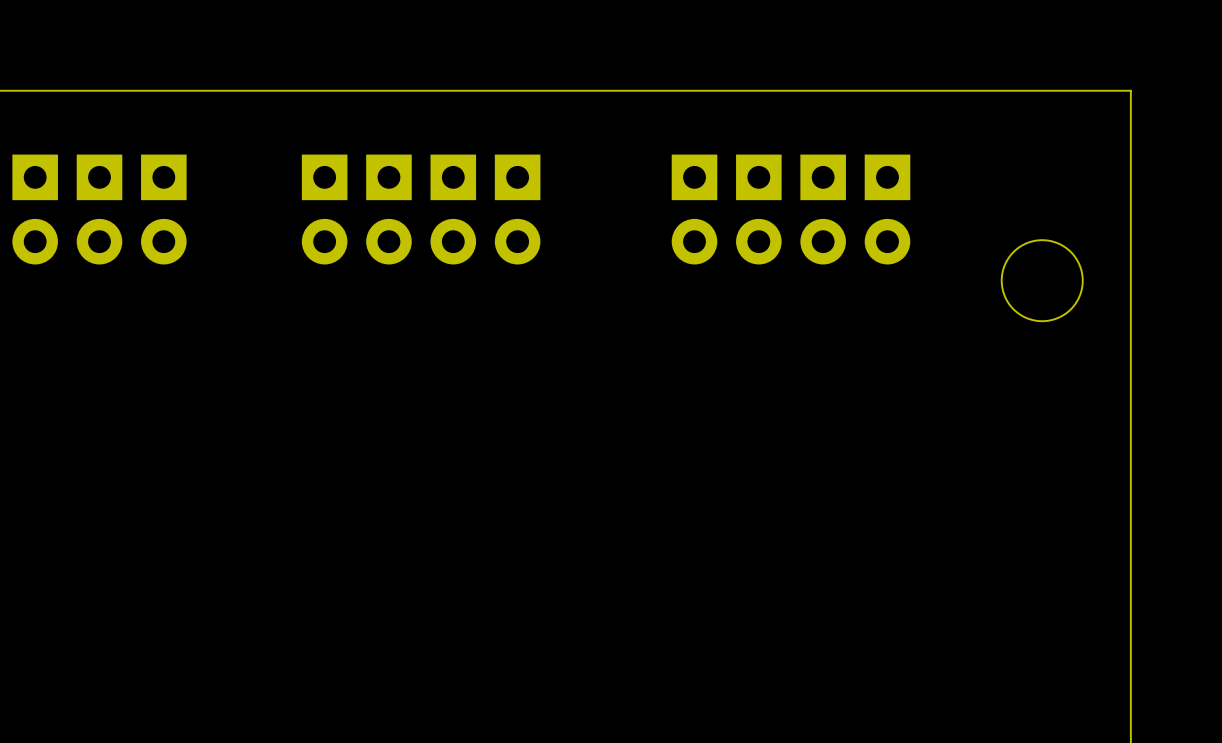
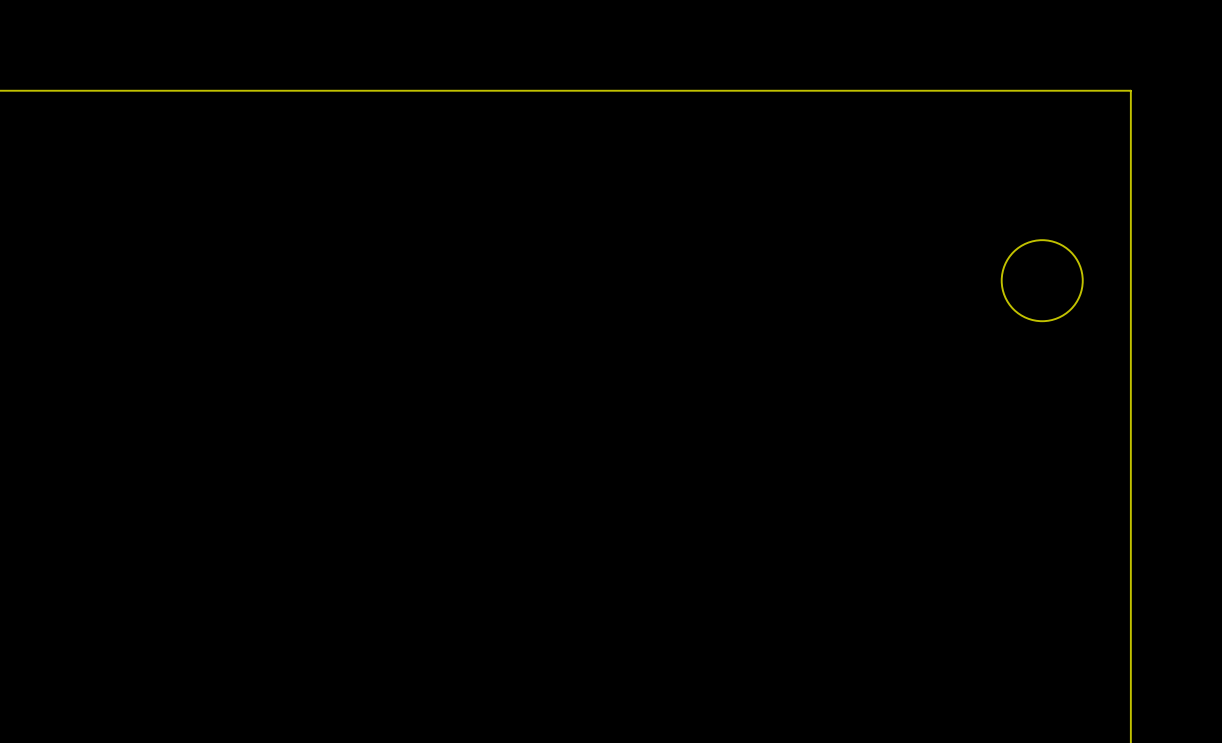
part: (35, 209) -> none
part: (99, 209) -> none
part: (163, 209) -> none
part: (324, 209) -> none
part: (388, 209) -> none
part: (453, 209) -> none
part: (517, 209) -> none
part: (694, 209) -> none
part: (758, 209) -> none
part: (823, 209) -> none
part: (887, 209) -> none

